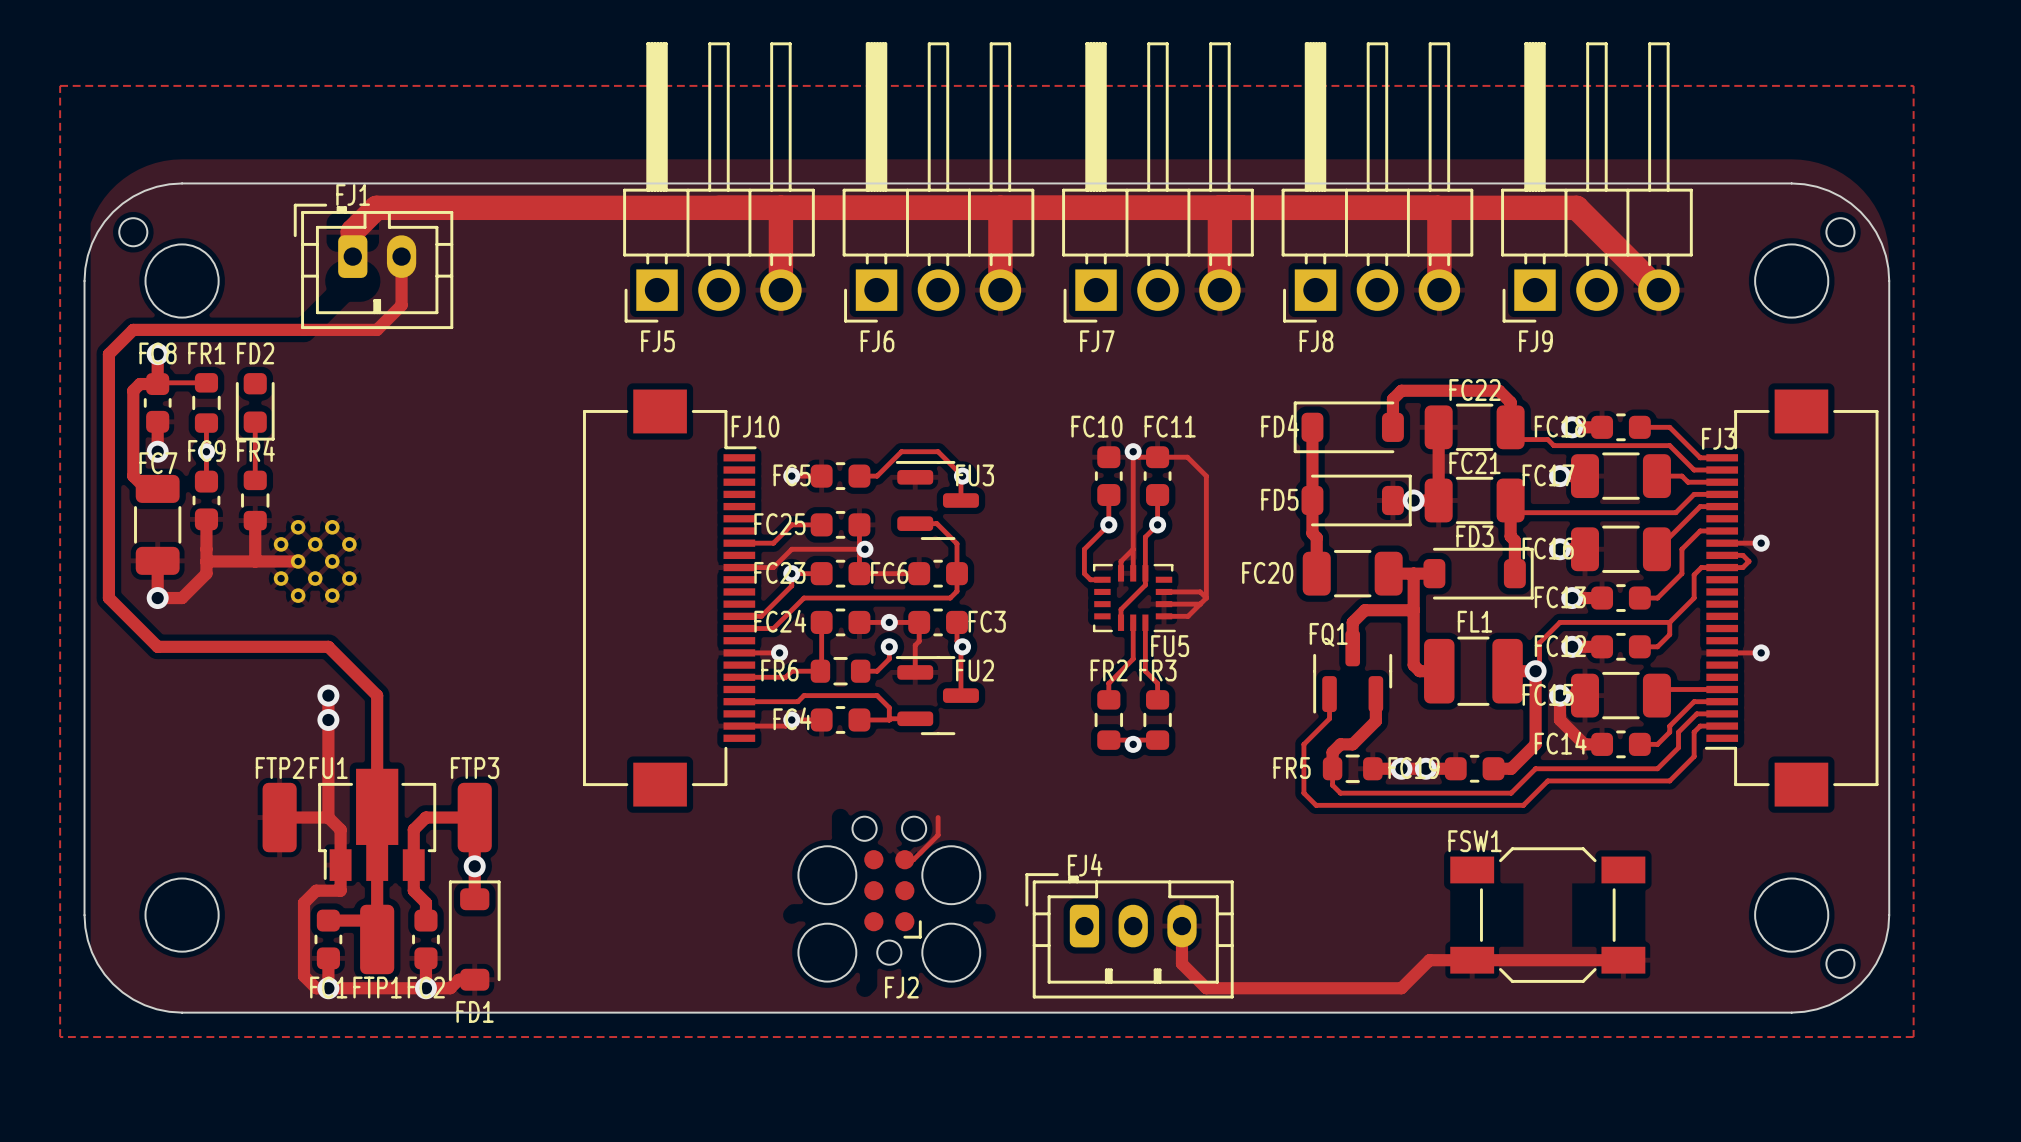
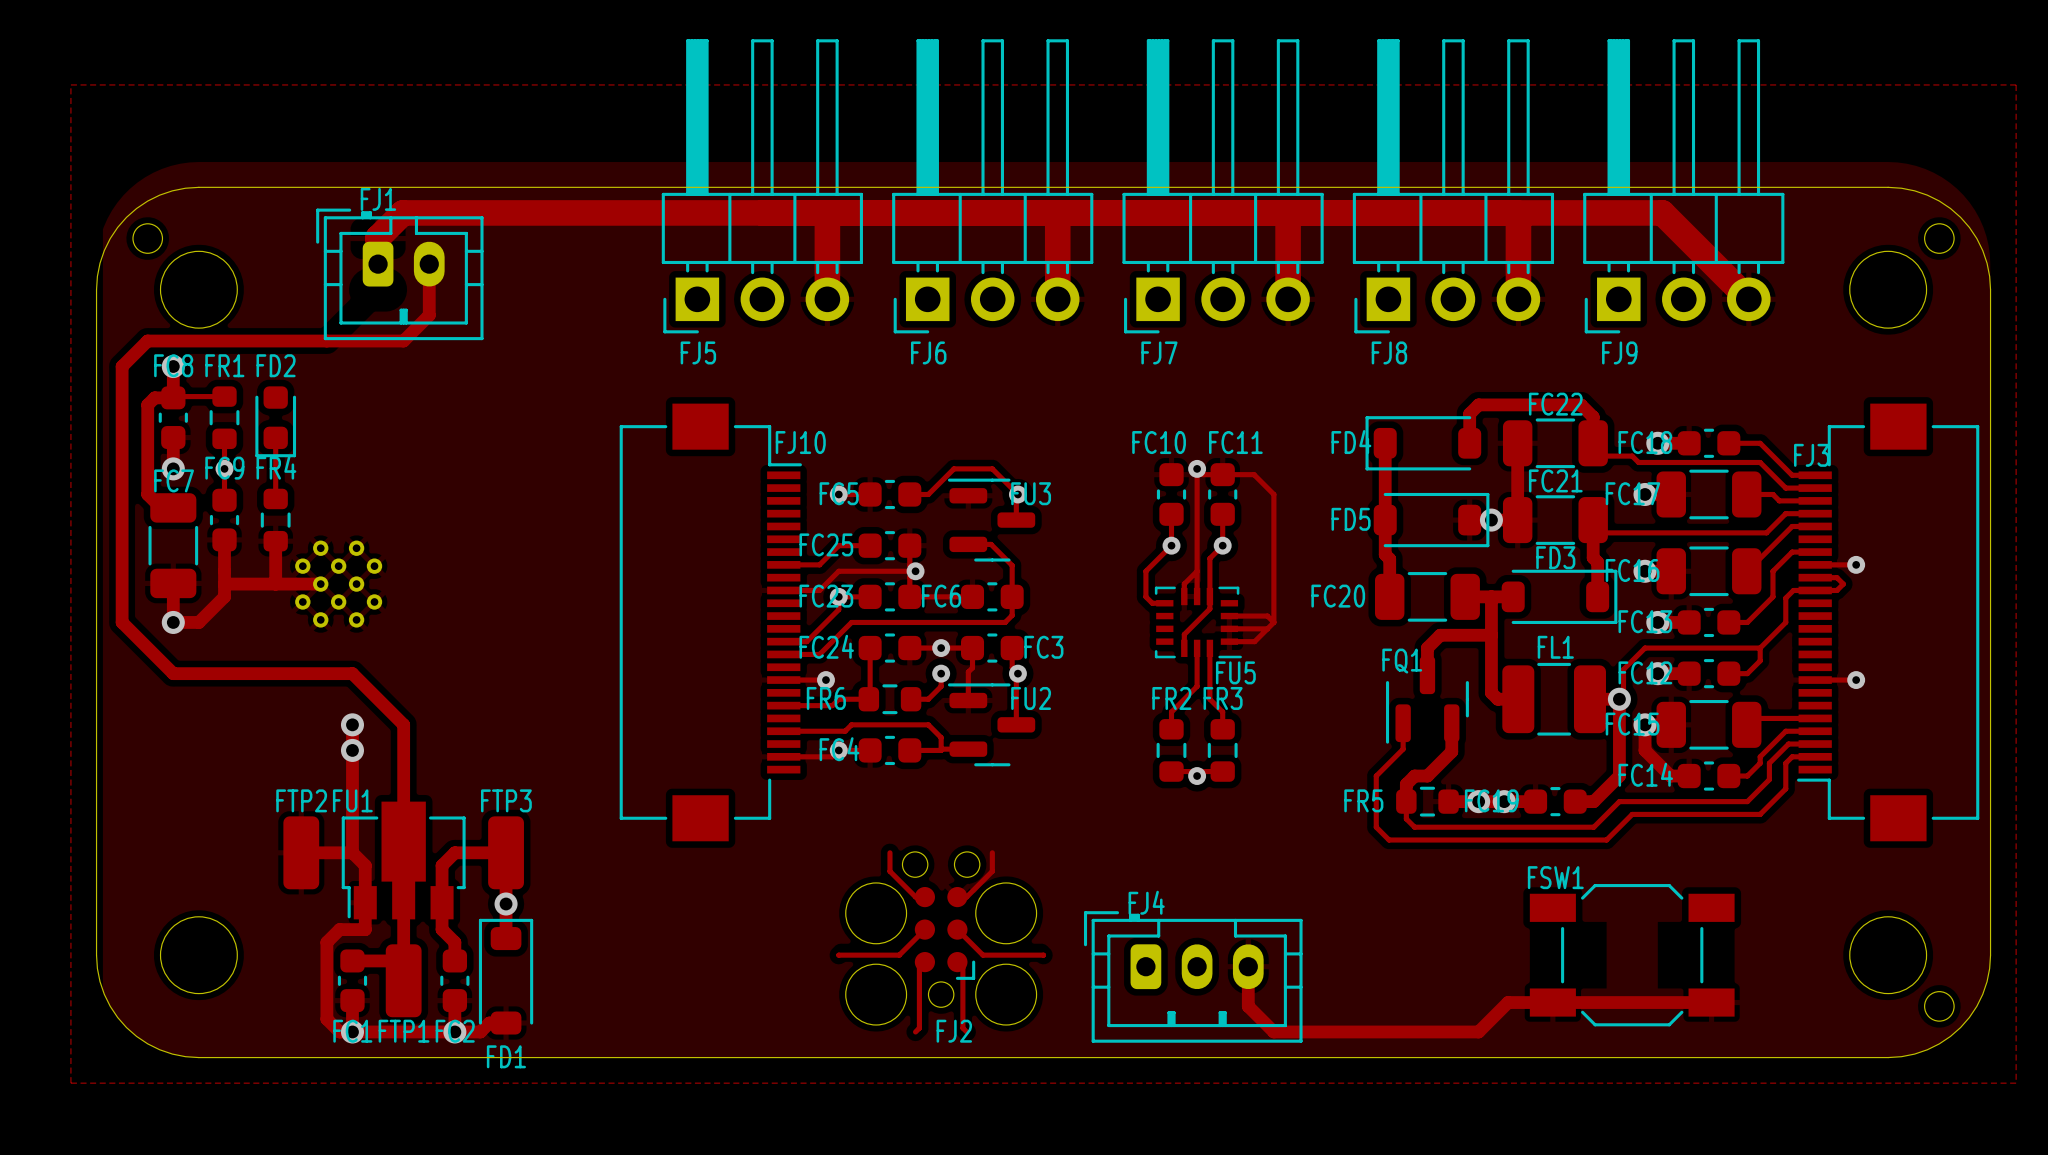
track: none -> (889, 852) (889, 871) (915, 897) (924, 897)
track: none -> (924, 929) (899, 955) (838, 955)
track: none -> (957, 929) (982, 955) (1043, 955)
track: none -> (924, 962) (919, 967) (919, 1028) (915, 1031)
track: none -> (957, 962) (962, 967) (962, 1028) (966, 1031)

